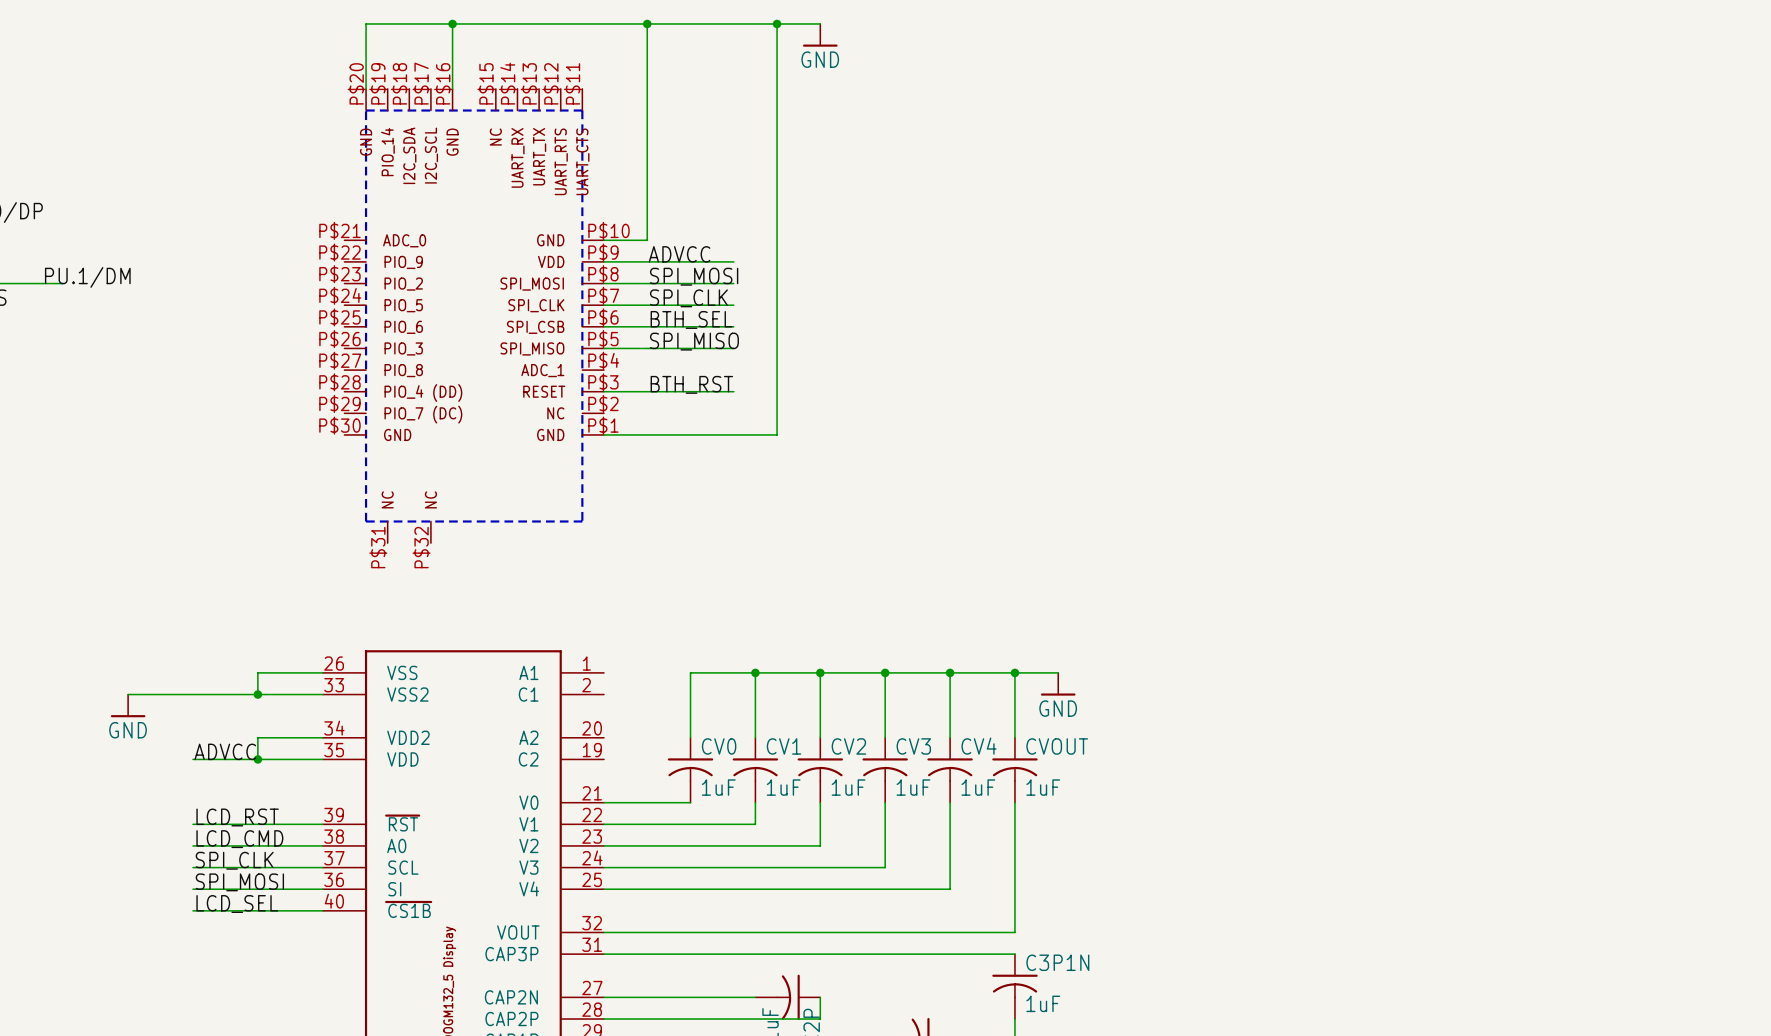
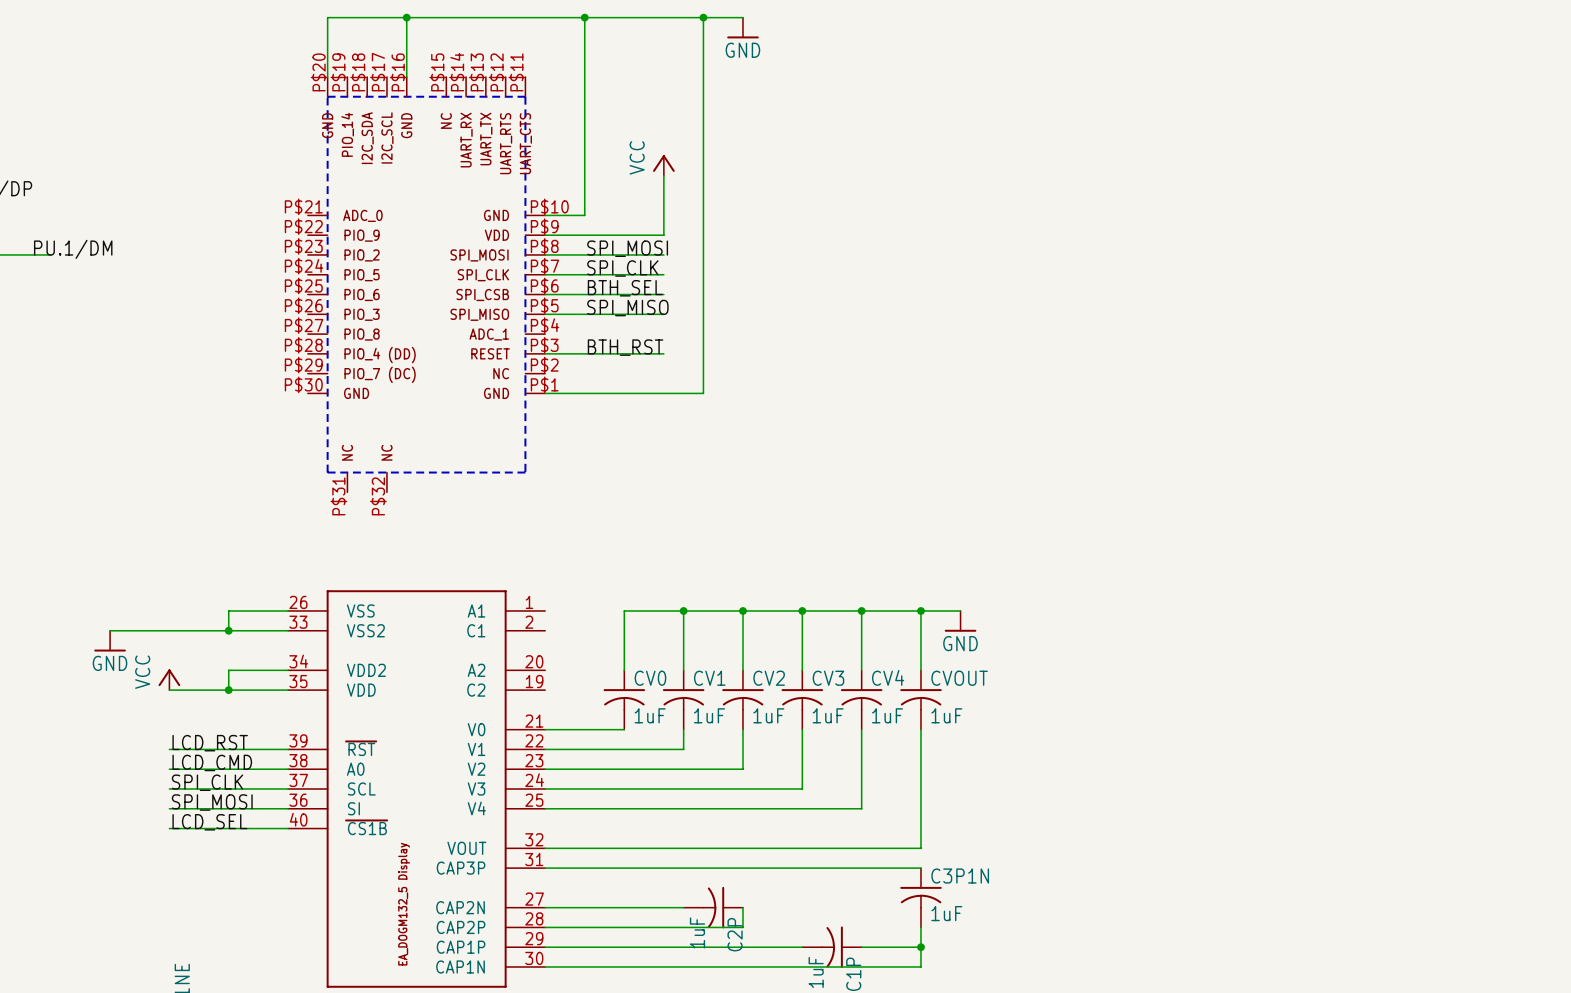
power symbol: none -> VCC (663, 165)
wire: none -> (663, 175) (663, 235)
label: ADVCC (679, 254) -> none
power symbol: none -> VCC (169, 679)
label: ADVCC (225, 751) -> none

